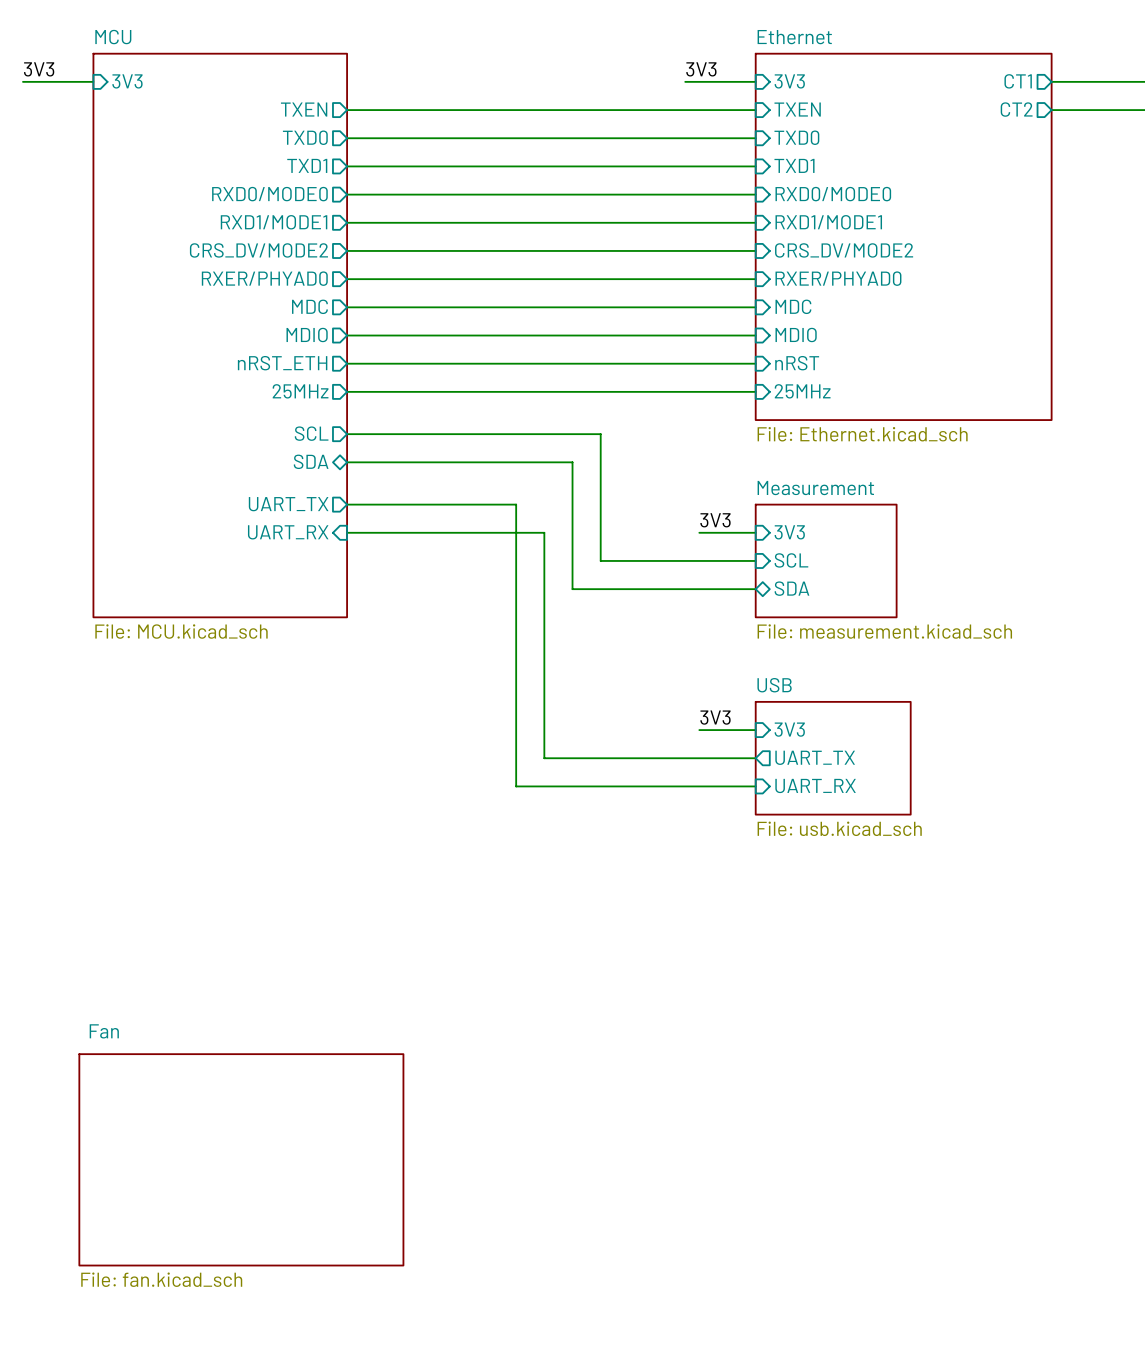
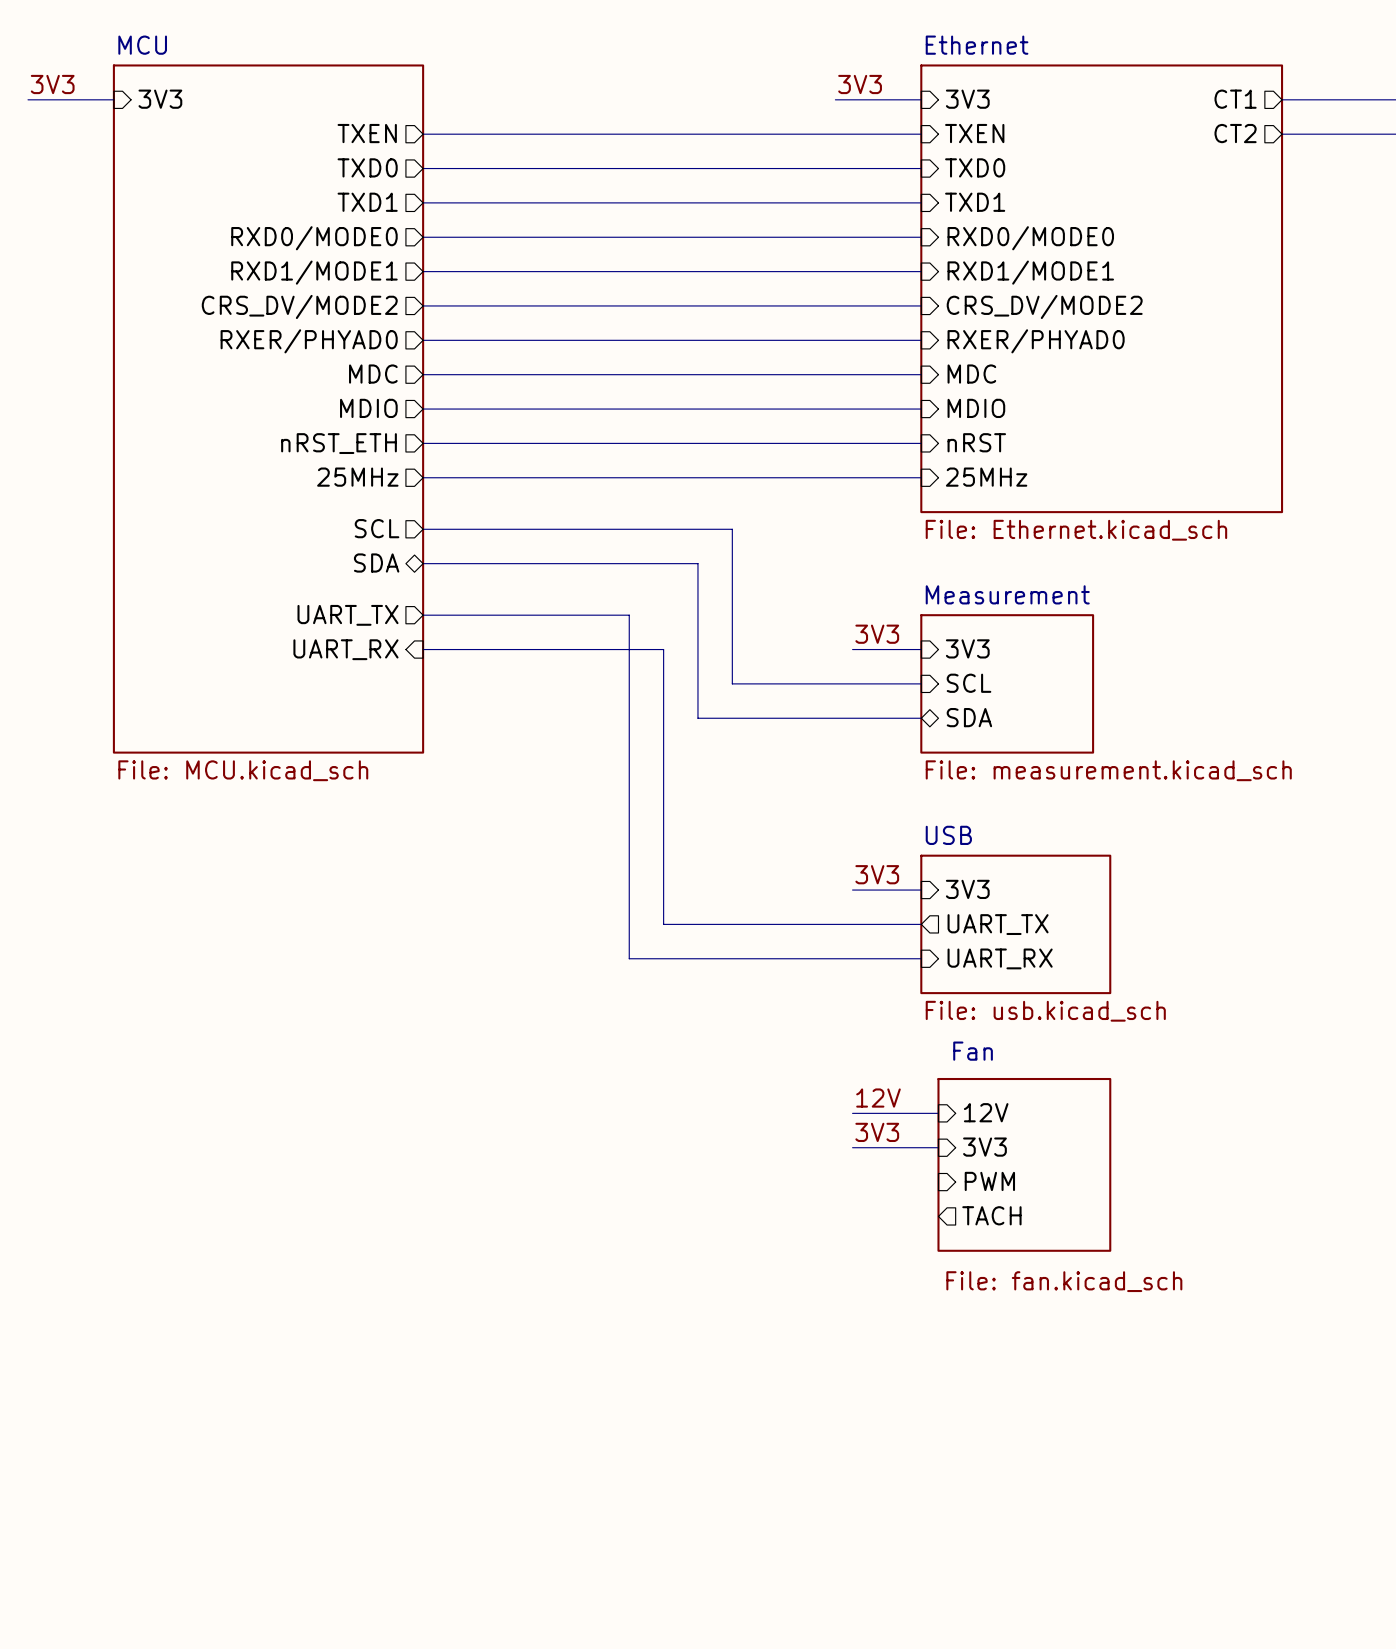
label: none -> 12V (878, 1098)
sheet pin: none -> 12V (986, 1112)
wire: none -> (852, 1113) (938, 1113)
label: none -> 3V3 (877, 1132)
sheet pin: none -> 3V3 (984, 1147)
wire: none -> (852, 1147) (938, 1147)
sheet Fan: none -> File: fan.kicad_sch (1024, 1164)
sheet pin: none -> PWM (989, 1181)
sheet pin: none -> TACH (991, 1215)
sheet Fan: File: fan.kicad_sch (241, 1159) -> none

